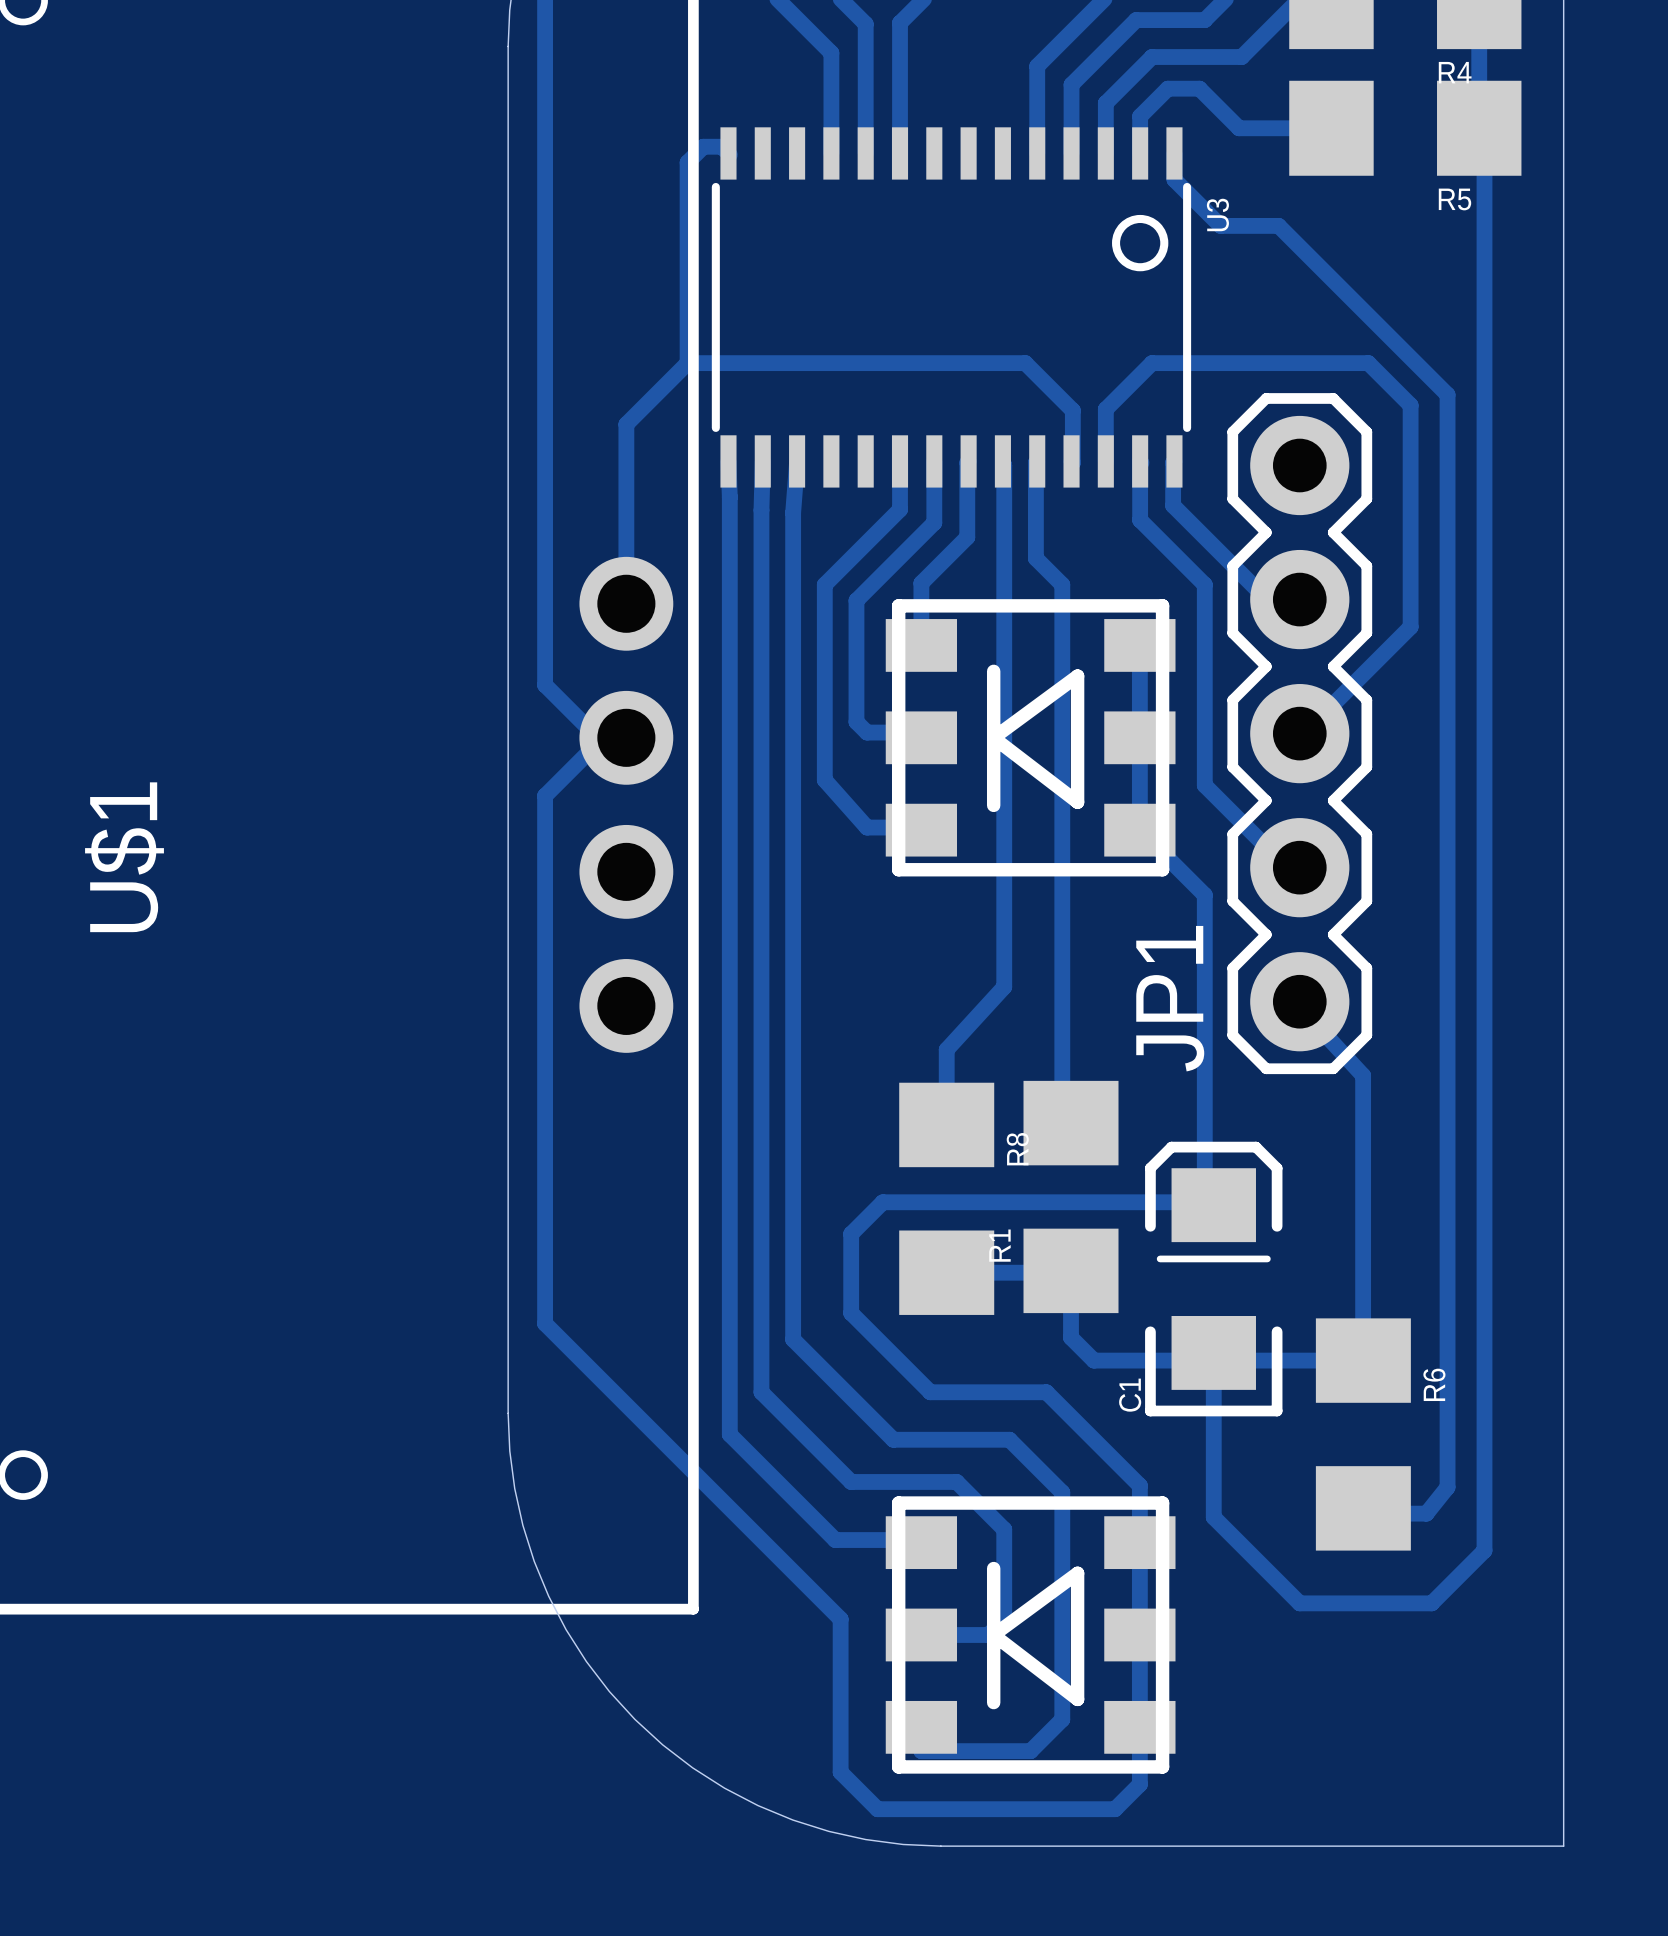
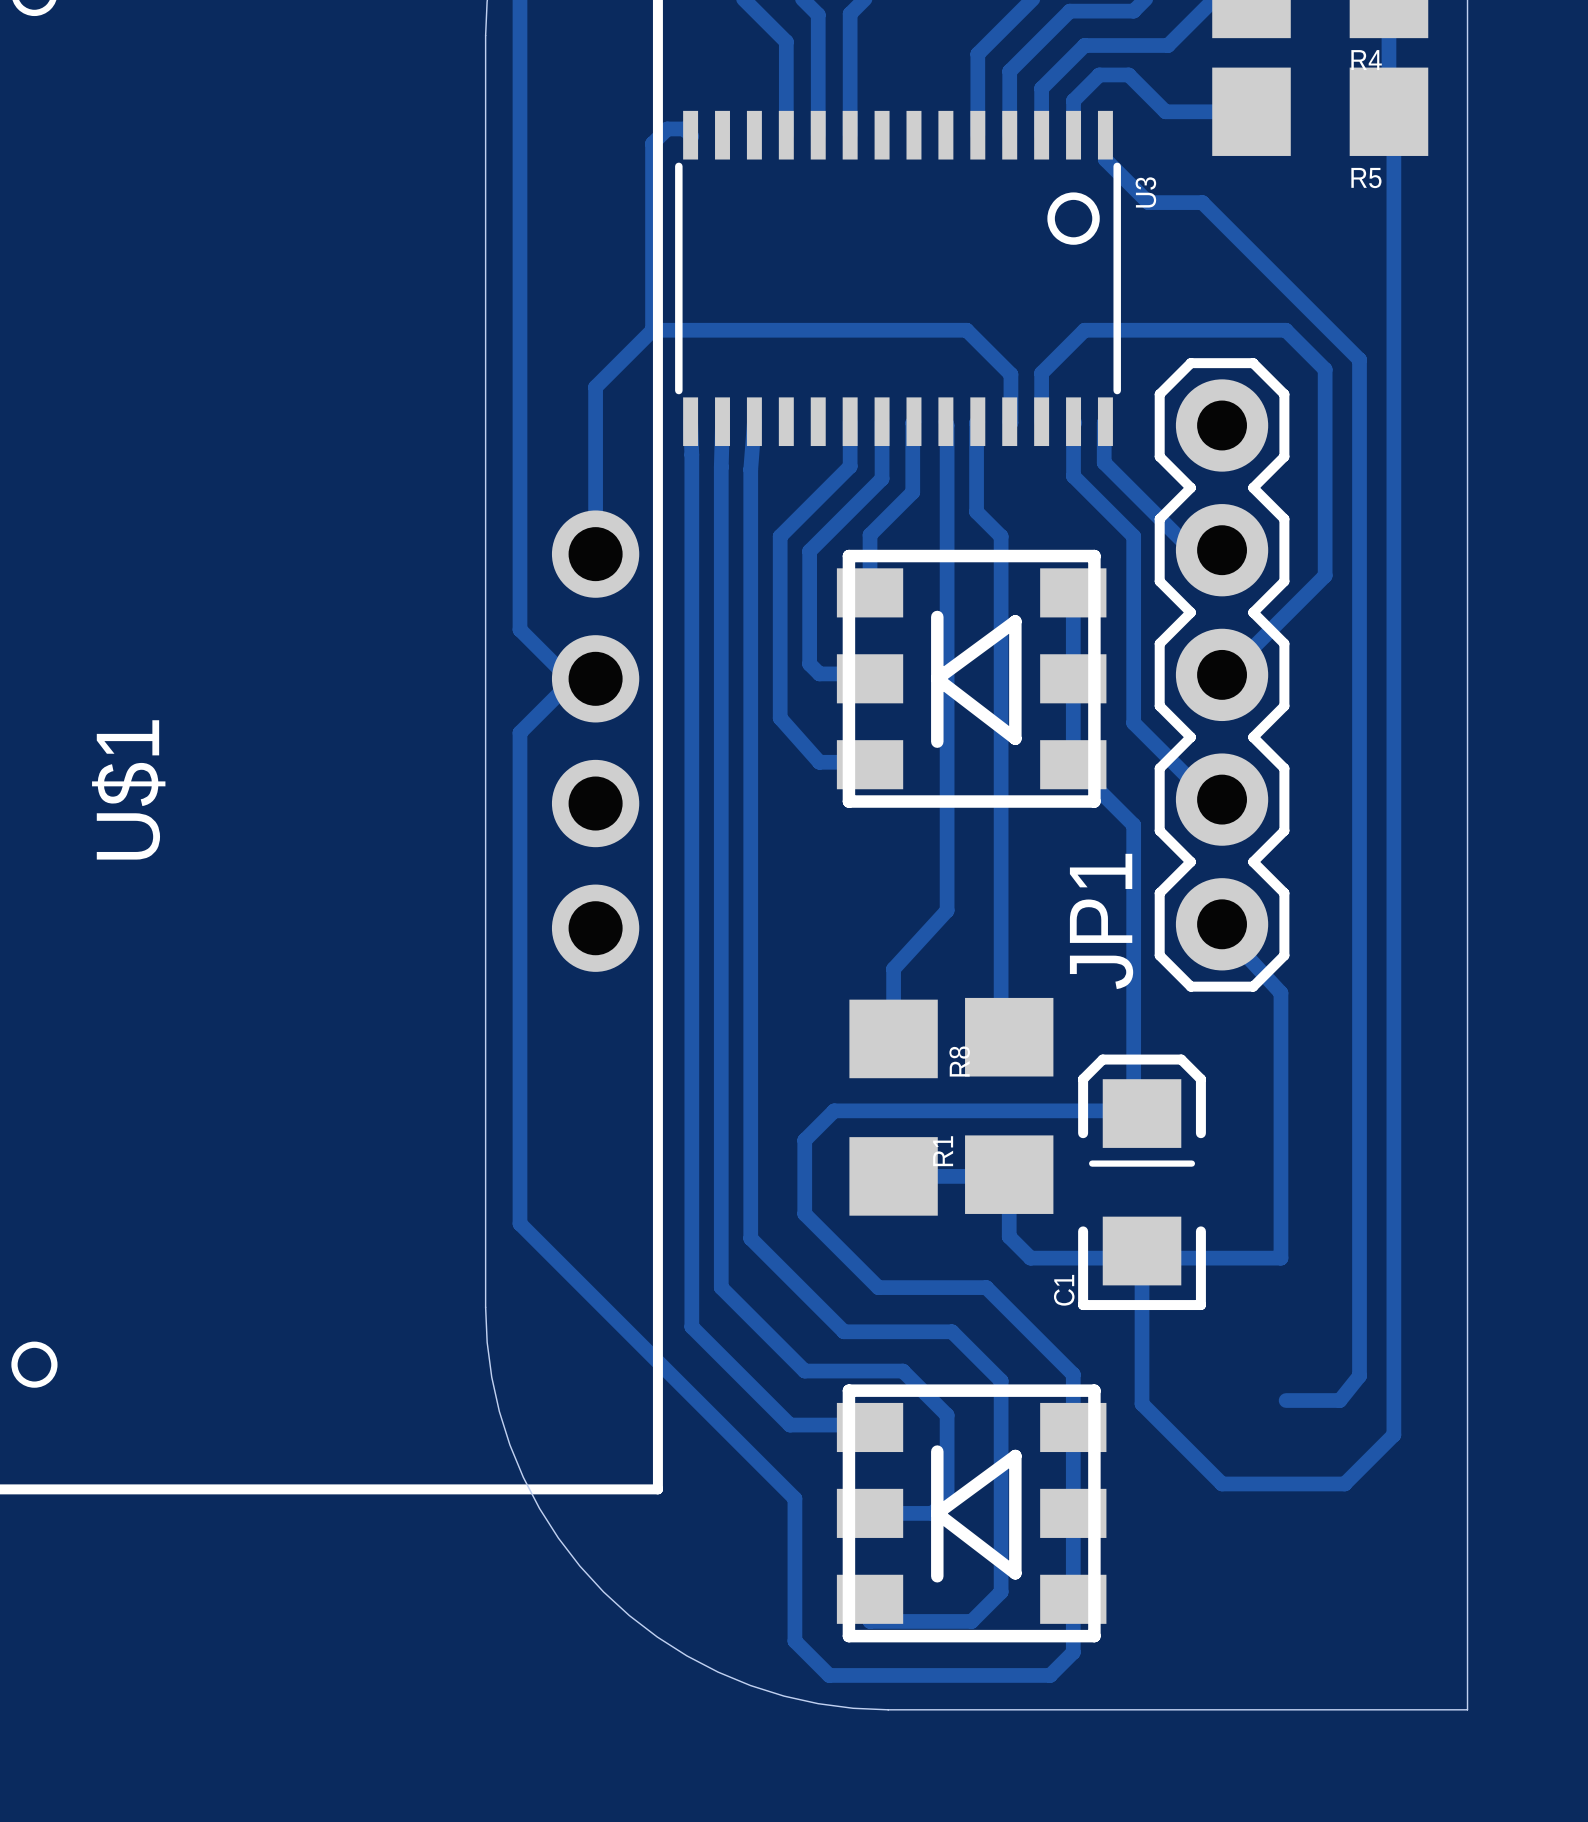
R6: (1363, 1434) -> none

